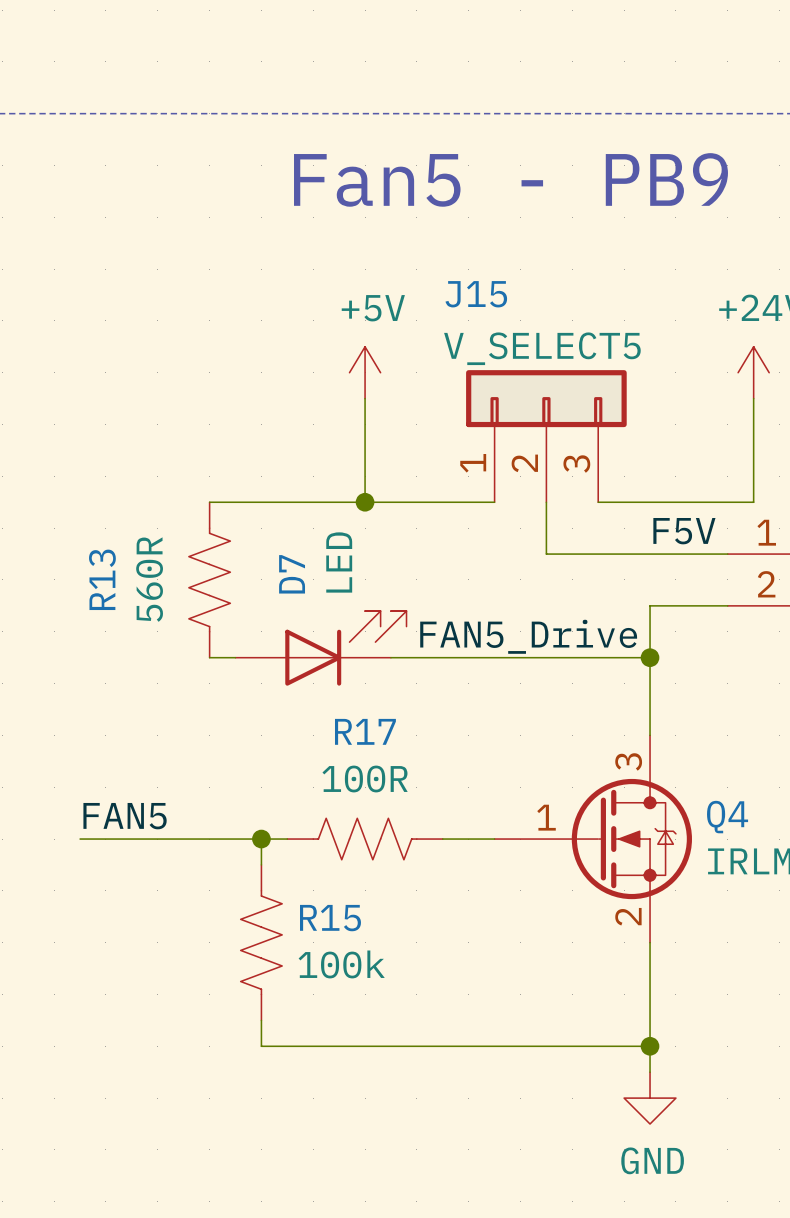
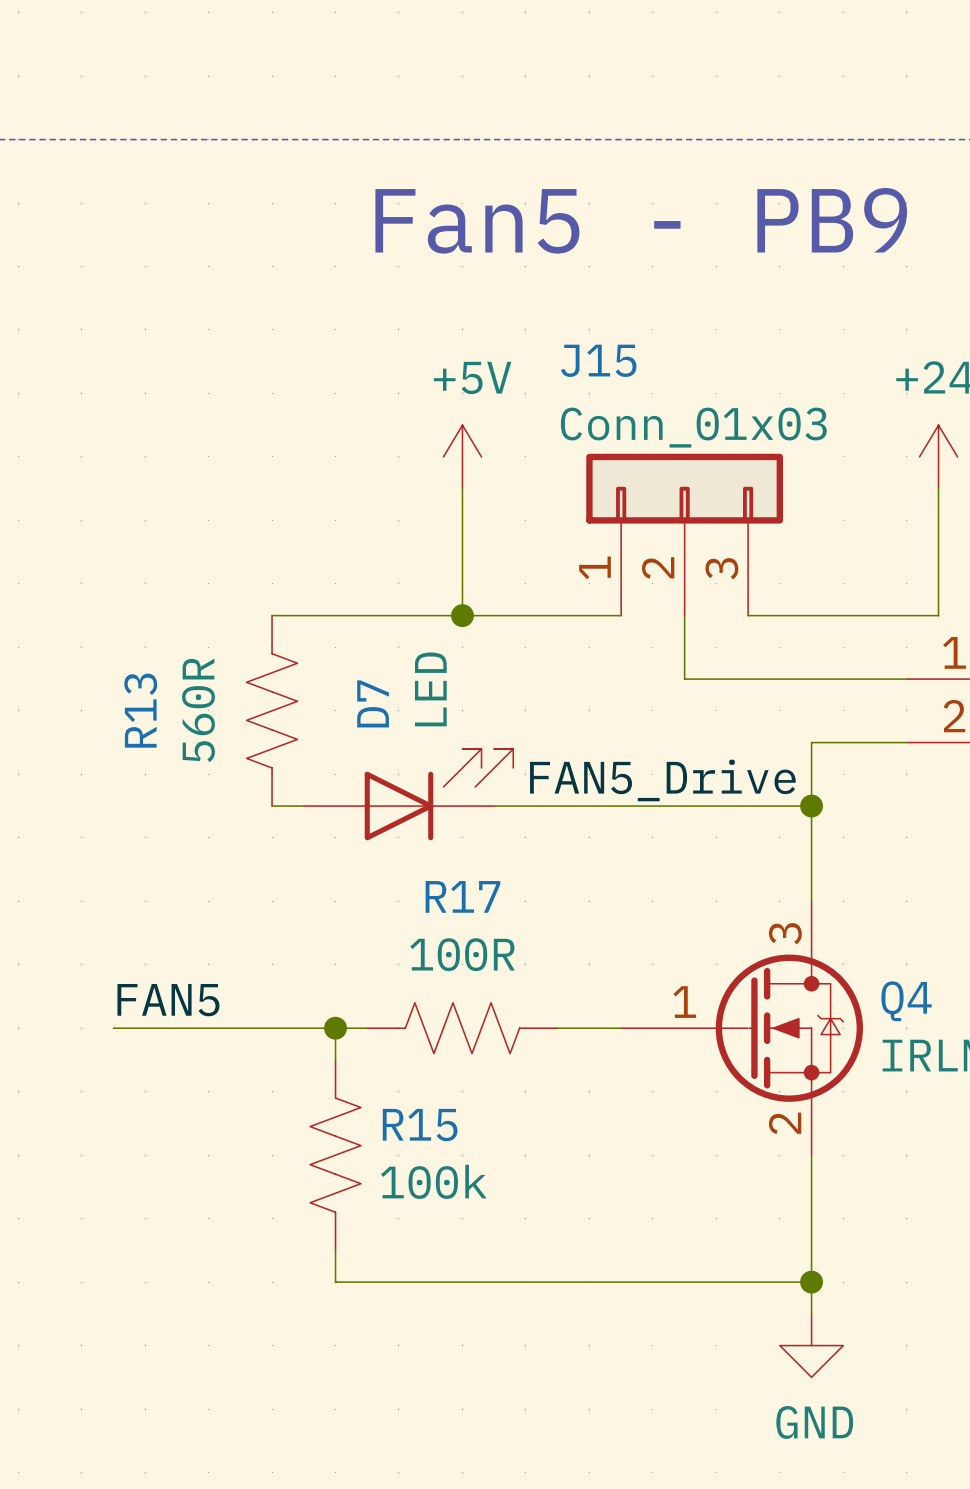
J15 value: V_SELECT5 (542, 348) -> Conn_01x03 (693, 427)
label: F5V (684, 531) -> none

